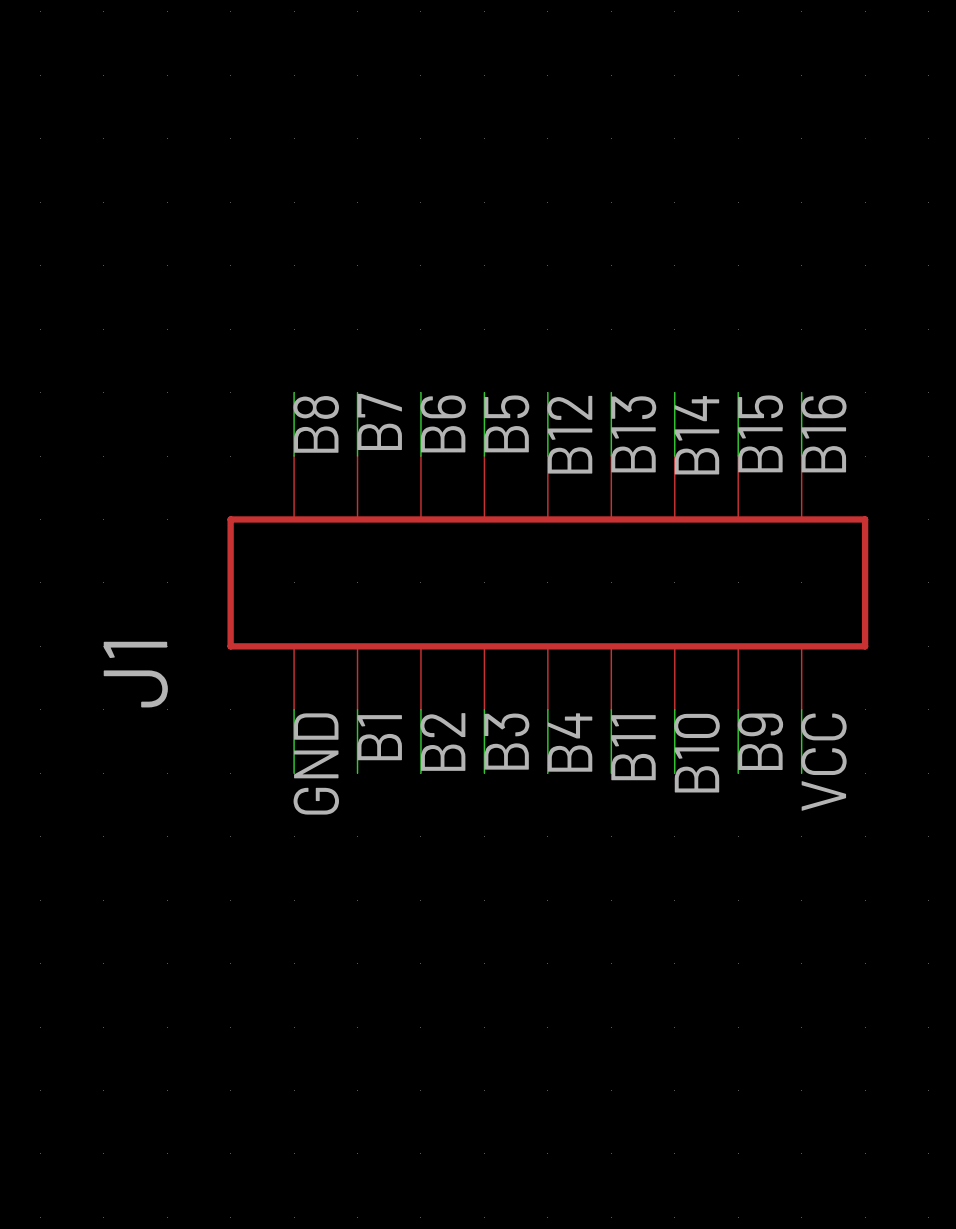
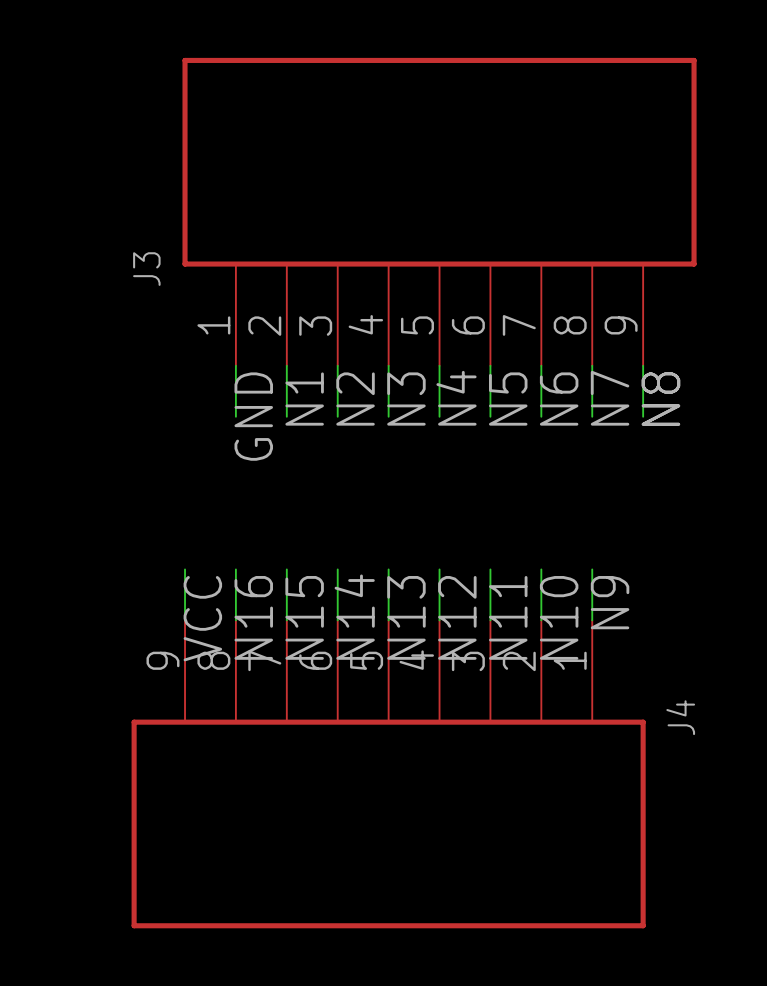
J3: none -> (439, 211)
label: B7 (379, 421) -> none
label: B6 (443, 423) -> none
label: B5 (506, 423) -> none
label: B8 (316, 424) -> none
label: B15 (760, 433) -> none
label: B16 (823, 433) -> none
label: B12 (569, 434) -> none
label: B13 (633, 434) -> none
label: B14 (696, 435) -> none
label: none -> N1 (304, 399)
label: none -> N7 (610, 398)
label: none -> N5 (508, 399)
label: none -> N6 (559, 399)
label: none -> N2 (355, 399)
label: none -> N3 (406, 399)
label: none -> N8 (660, 399)
label: none -> N4 (456, 398)
label: none -> GND (253, 416)
J1: (547, 582) -> none
wire: (801, 709) (801, 773) -> (185, 569) (185, 620)
label: B1 (379, 737) -> N15 (304, 617)
label: B2 (442, 741) -> N14 (354, 617)
label: B3 (506, 741) -> N13 (406, 617)
label: B9 (760, 741) -> N9 (610, 602)
label: B4 (570, 742) -> N12 (457, 617)
label: B11 (633, 747) -> N11 (508, 617)
label: B10 (697, 753) -> N10 (559, 617)
label position: VCC (823, 762) -> VCC (202, 618)
label: GND (316, 763) -> N16 (253, 617)
J4: none -> (388, 774)

